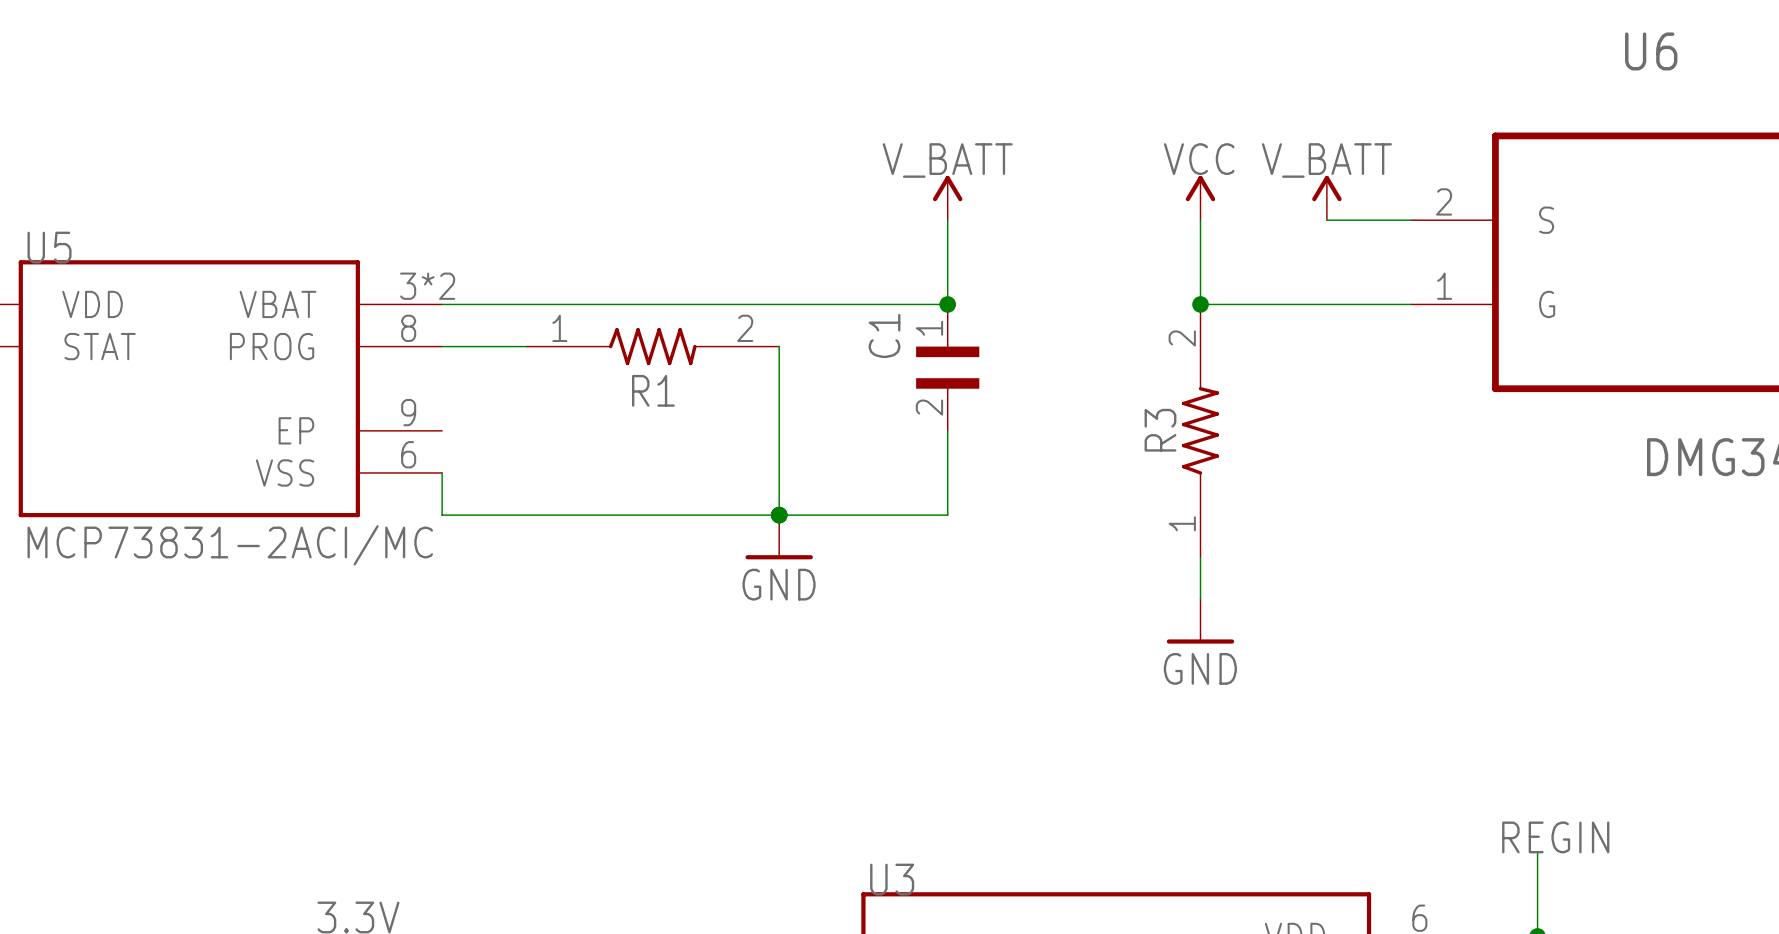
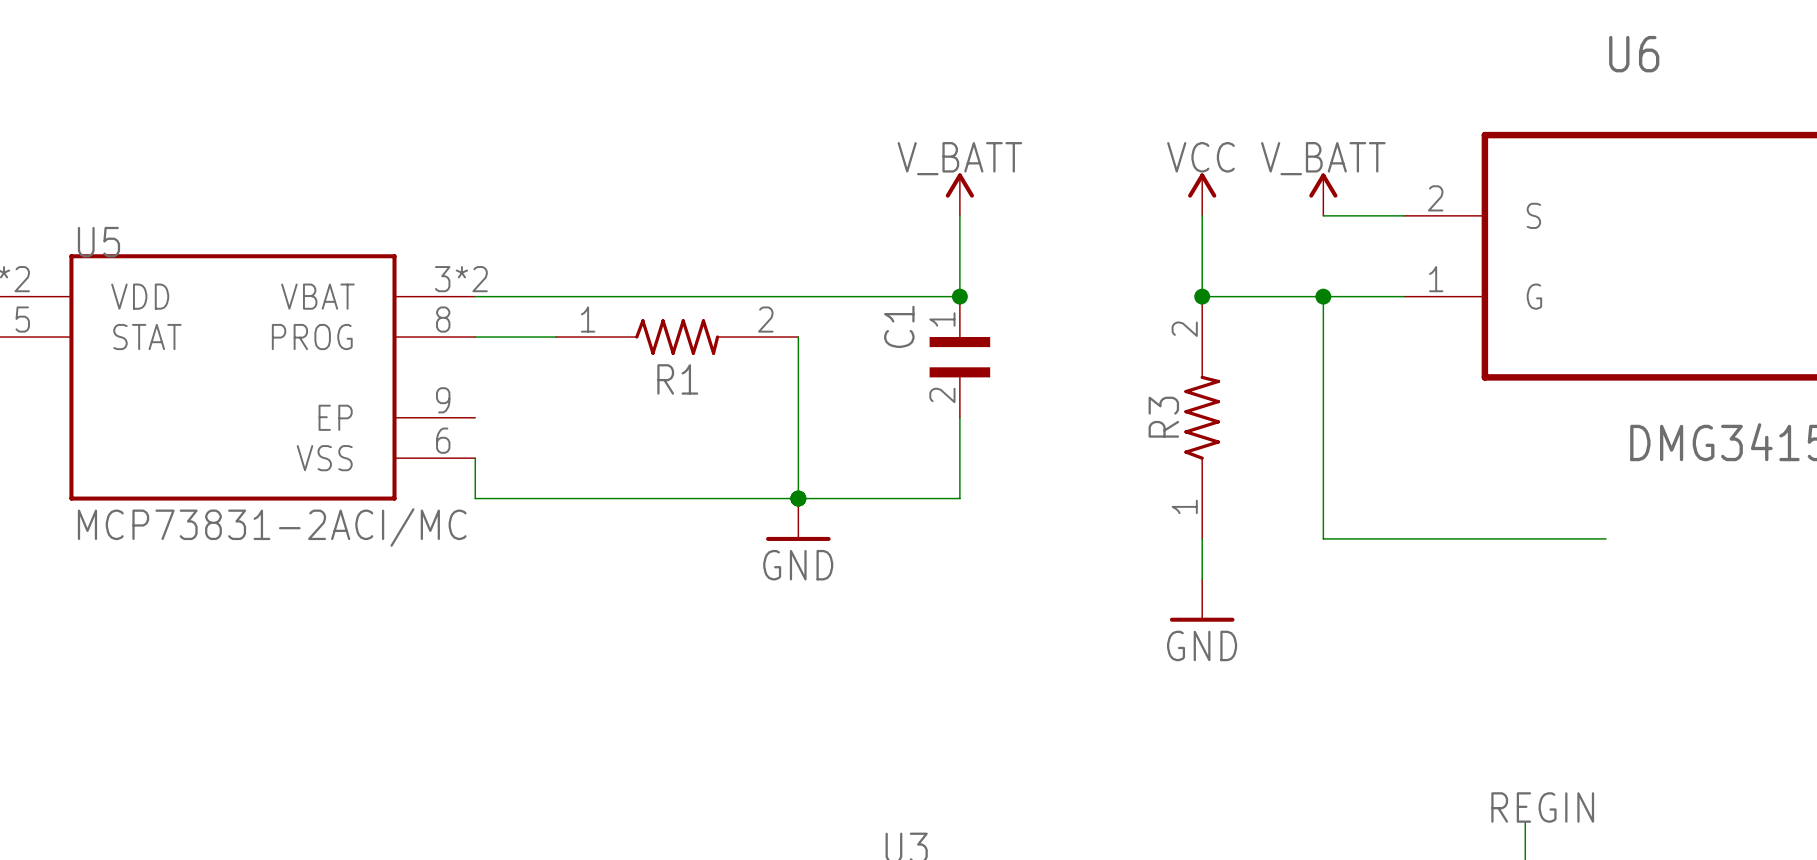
wire: none -> (1323, 296) (1323, 538) (1606, 538)
junction: none -> (1323, 296)

